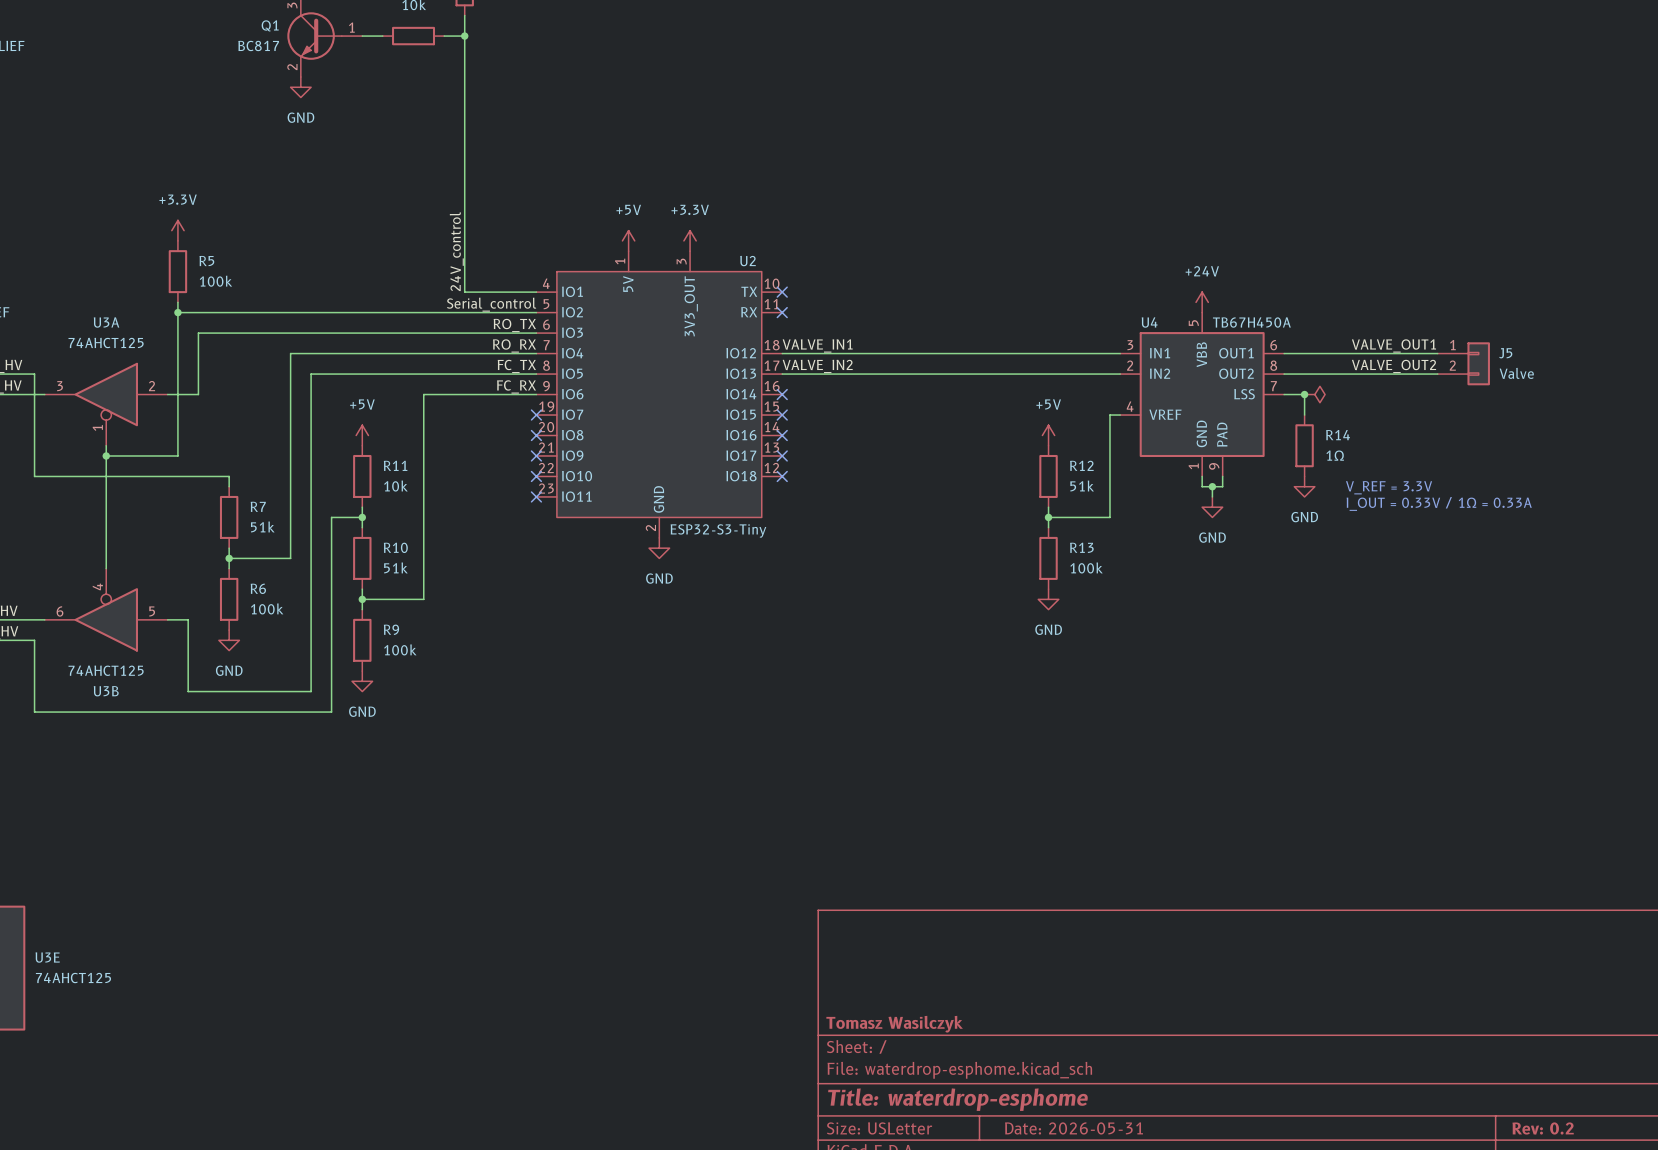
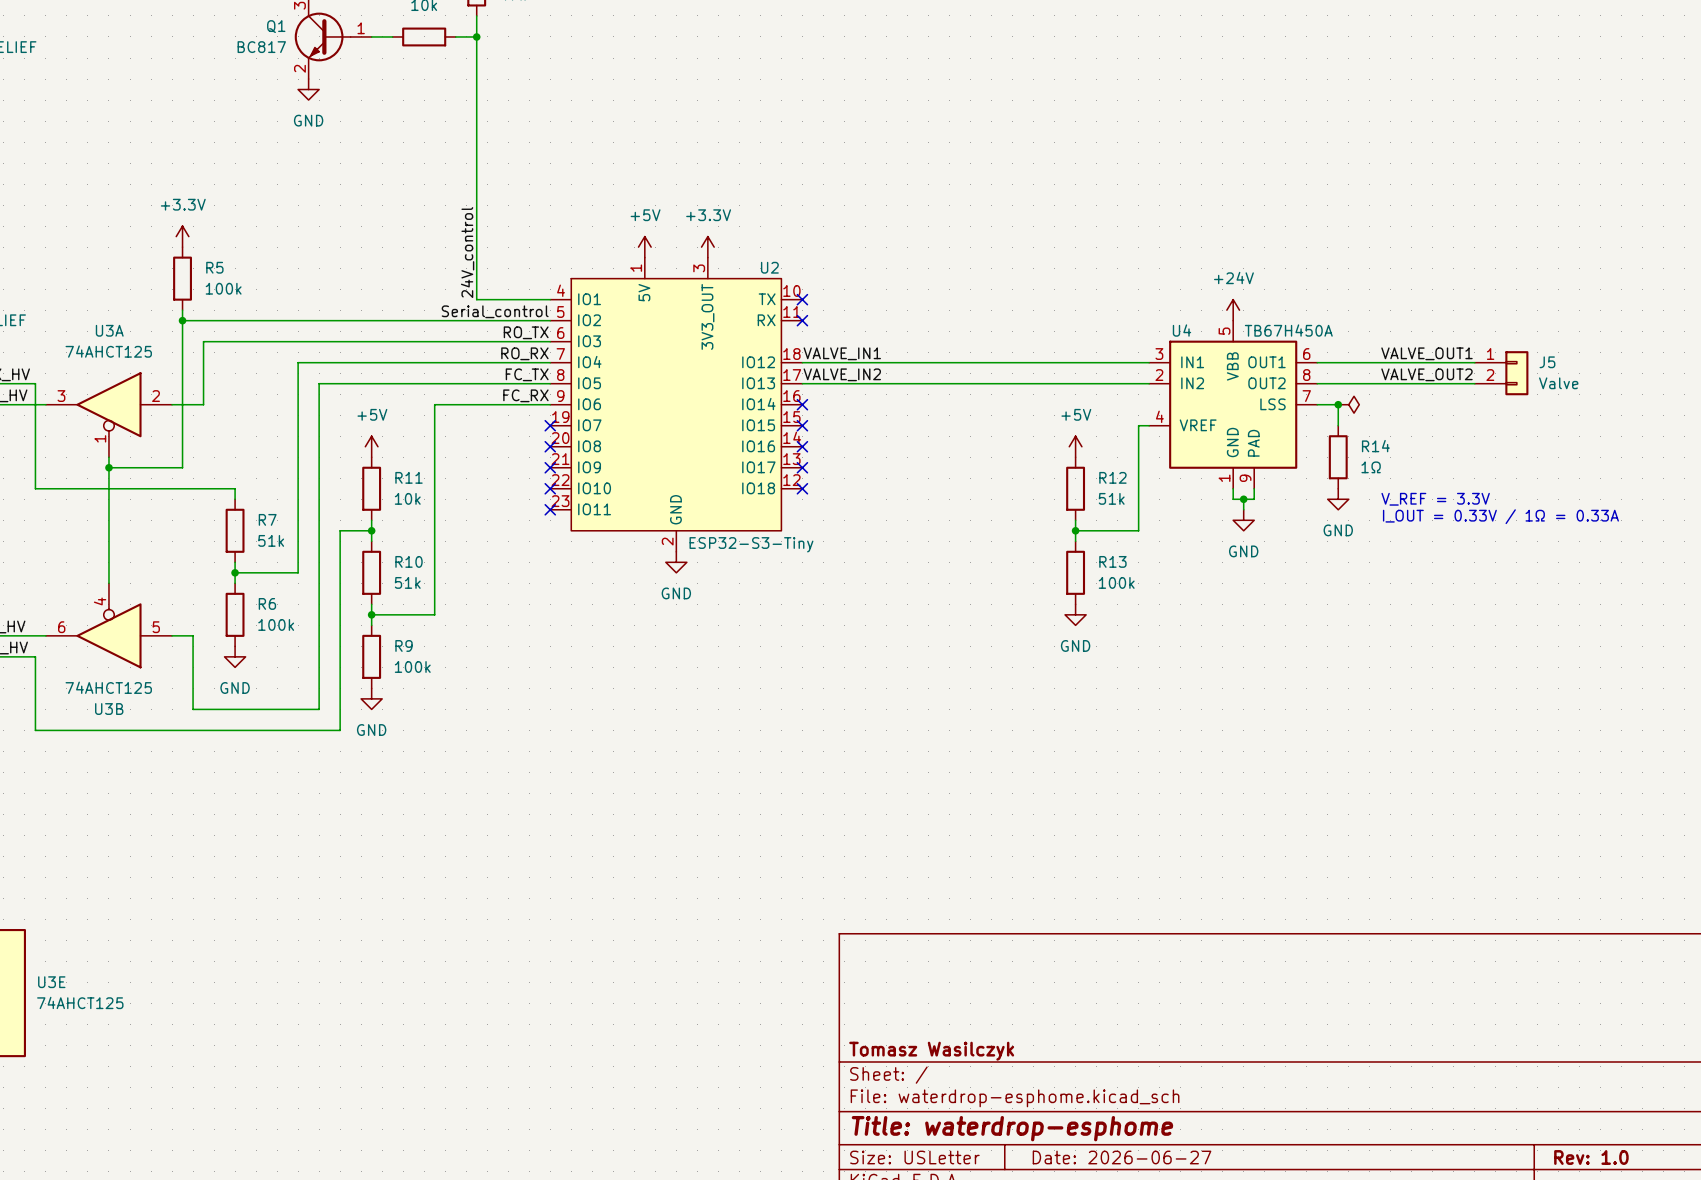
title block: Date: 2026-05-31 (1074, 1128) -> Date: 2026-06-27 (1122, 1157)
title block: Rev: 0.2 (1543, 1128) -> Rev: 1.0 (1591, 1157)

